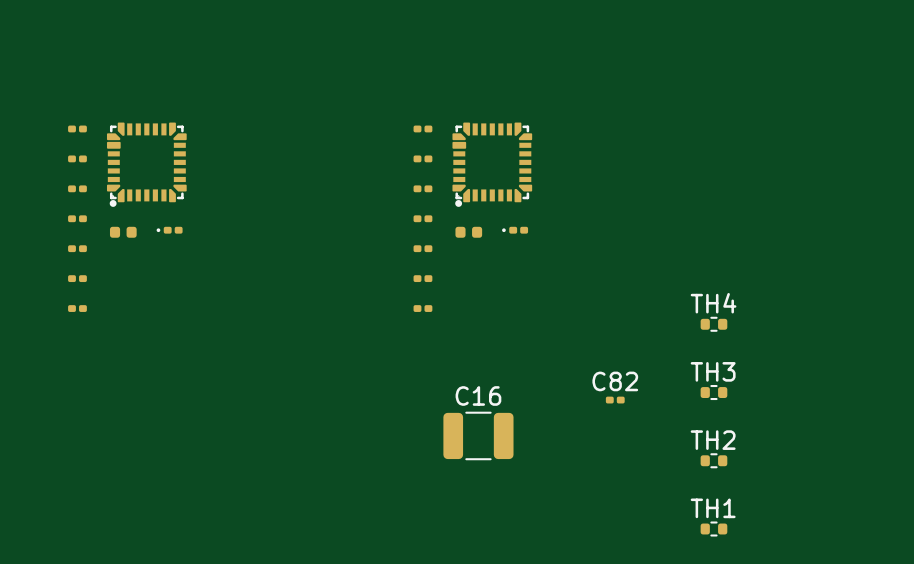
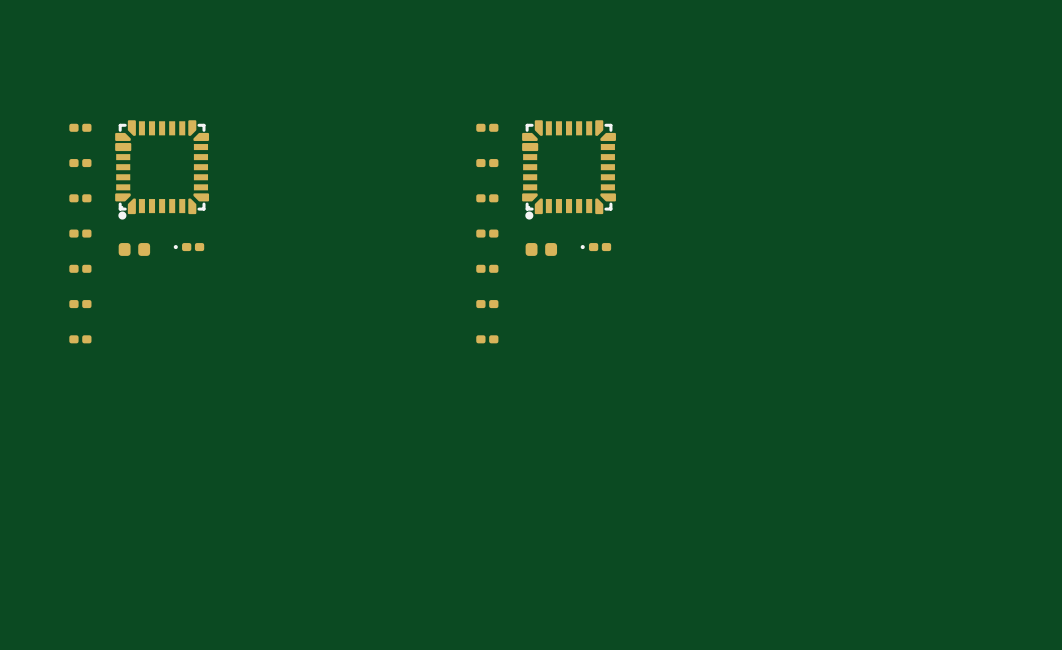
TH4: (713, 324) -> none
TH3: (713, 392) -> none
C82: (615, 400) -> none
C16: (478, 435) -> none
TH2: (713, 460) -> none
TH1: (713, 529) -> none

